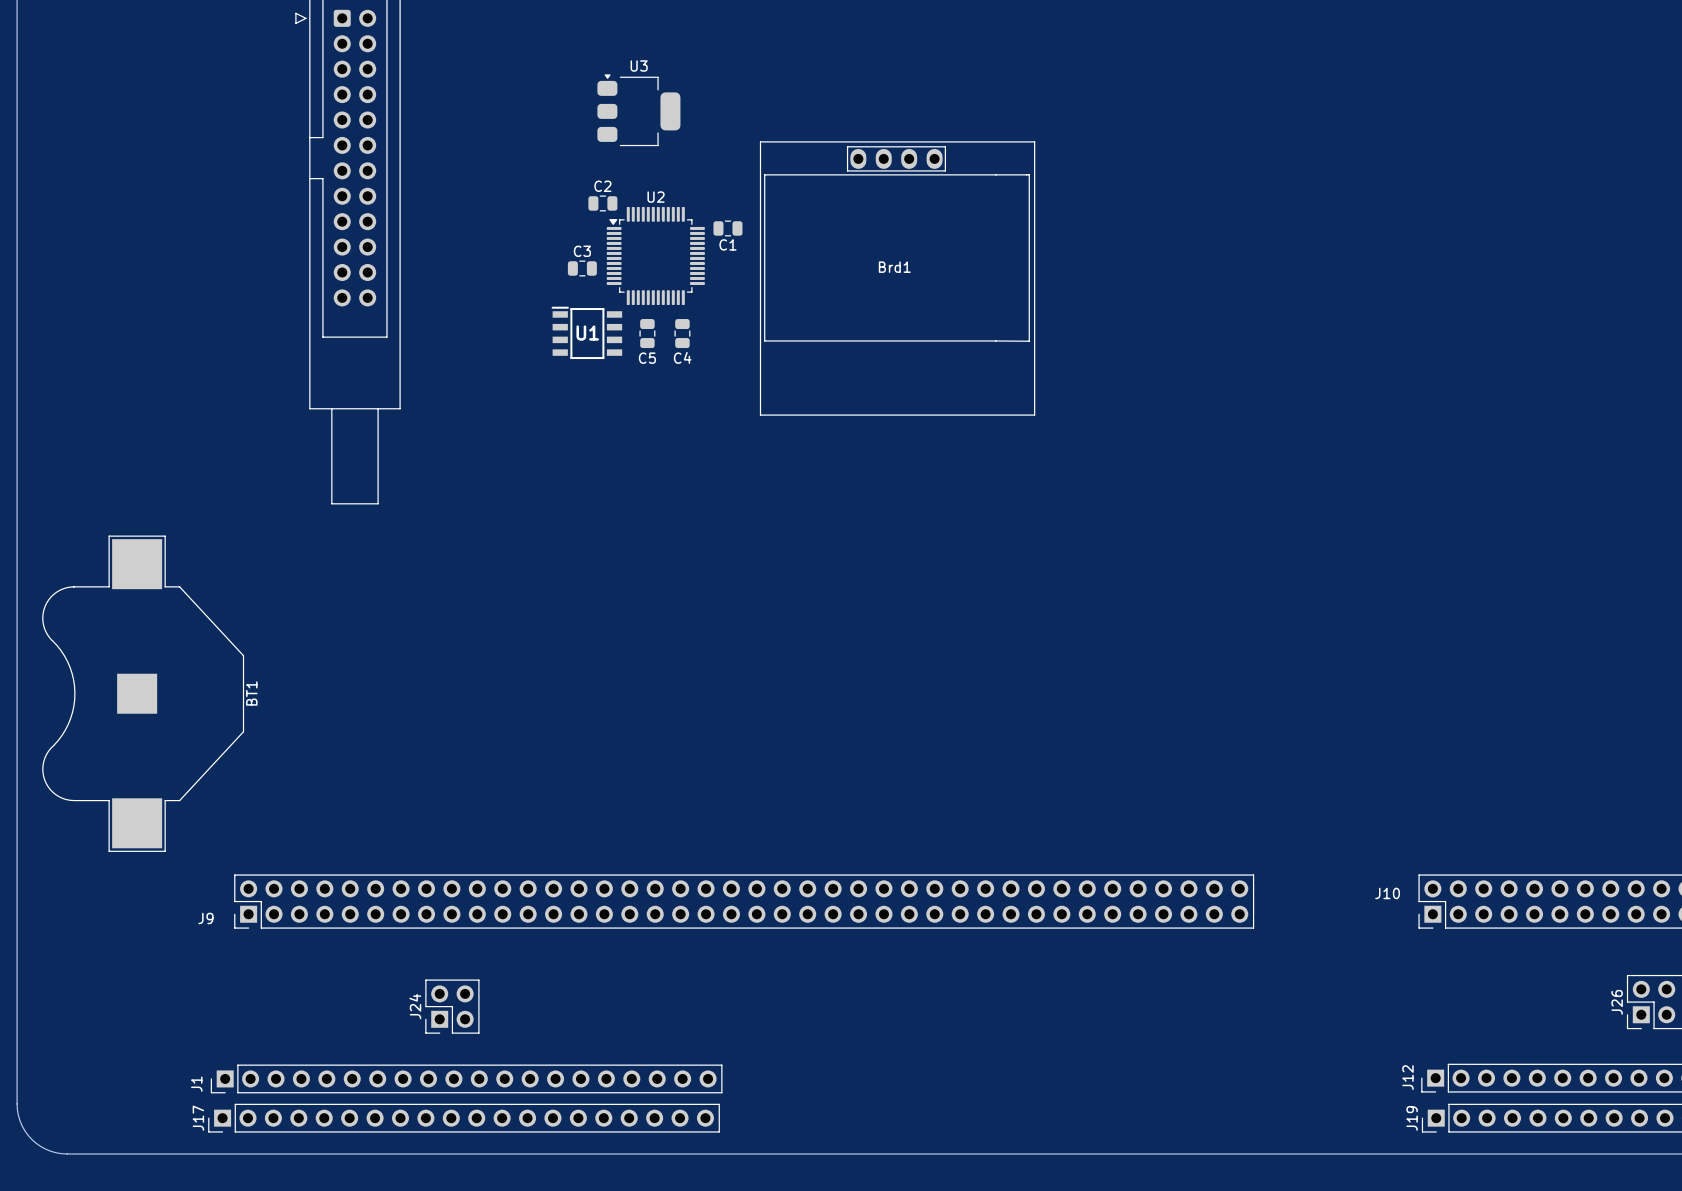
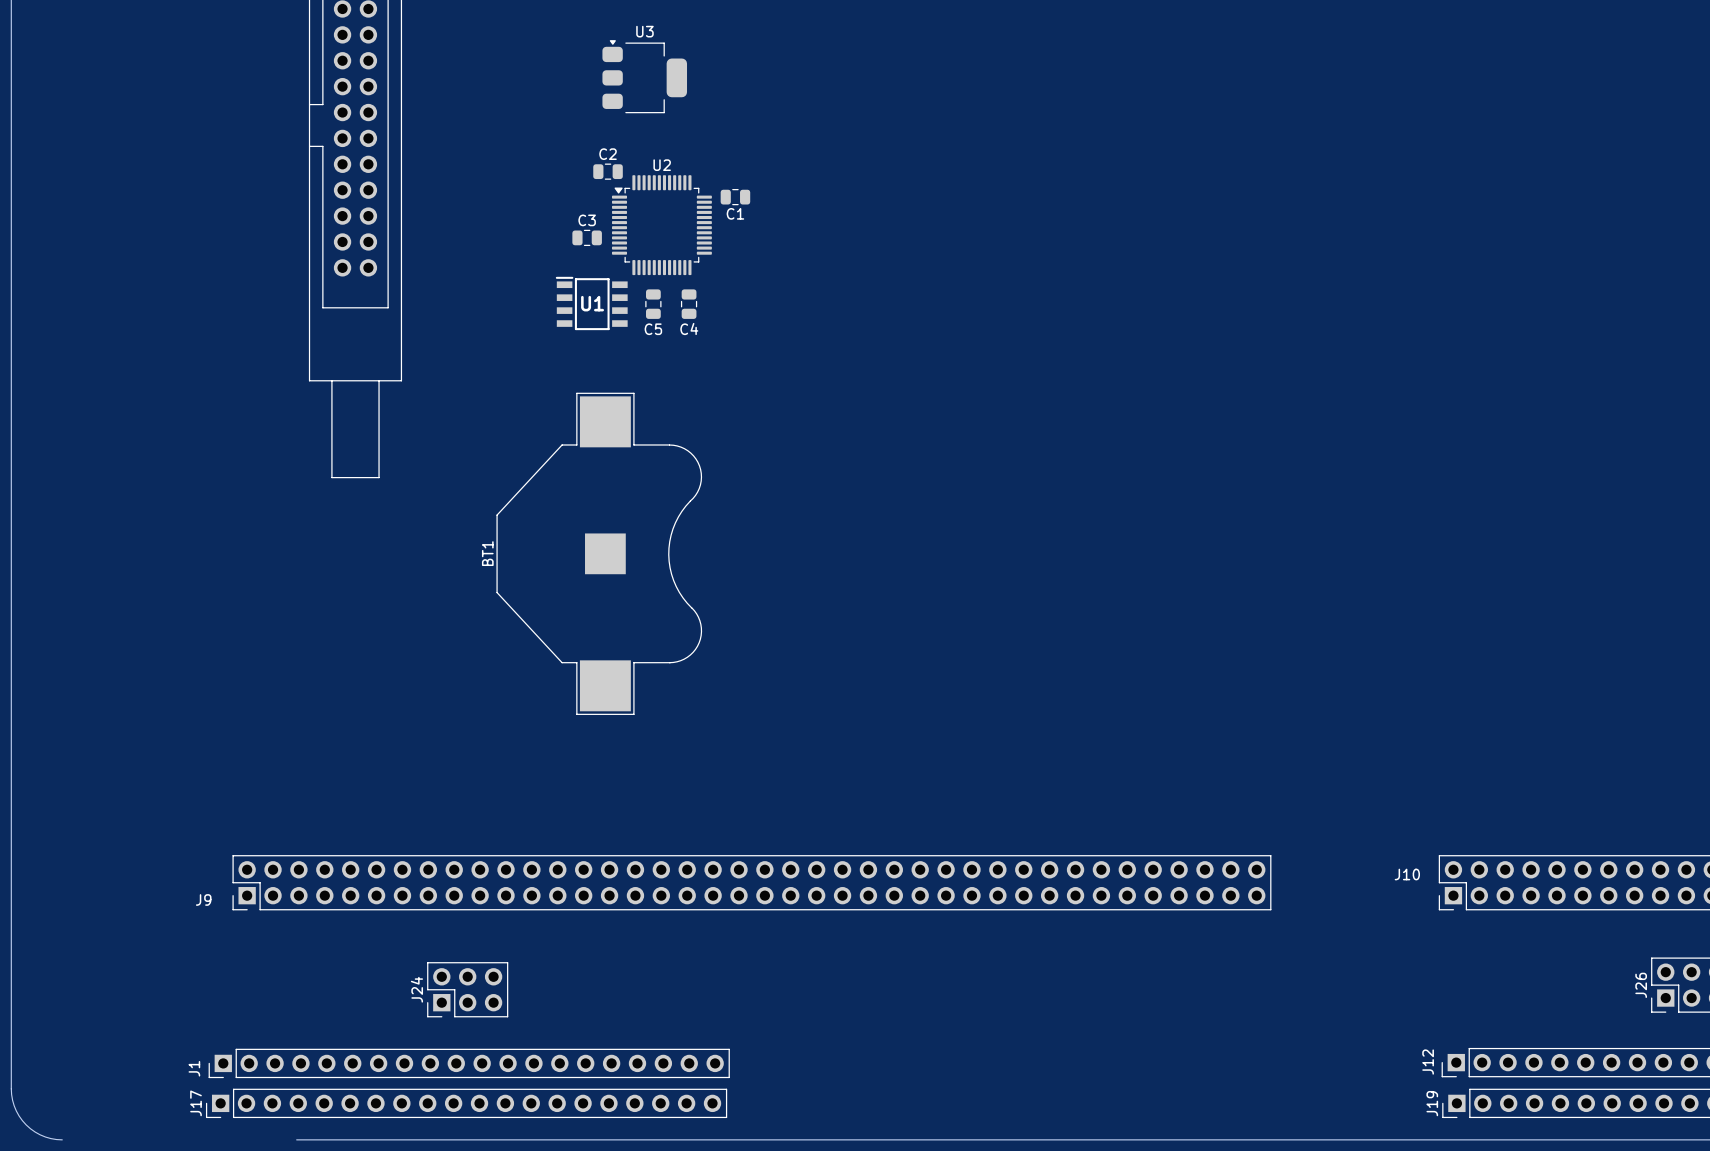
Brd1: (897, 278) -> none
BT1 rotation: 0° (143, 693) -> 180° (599, 553)
BT1 position: (143, 693) -> (599, 553)
J24 footprint: [425, 979, 480, 1034] -> [427, 962, 509, 1018]
board edge: (67, 1153) (297, 1153) -> none

